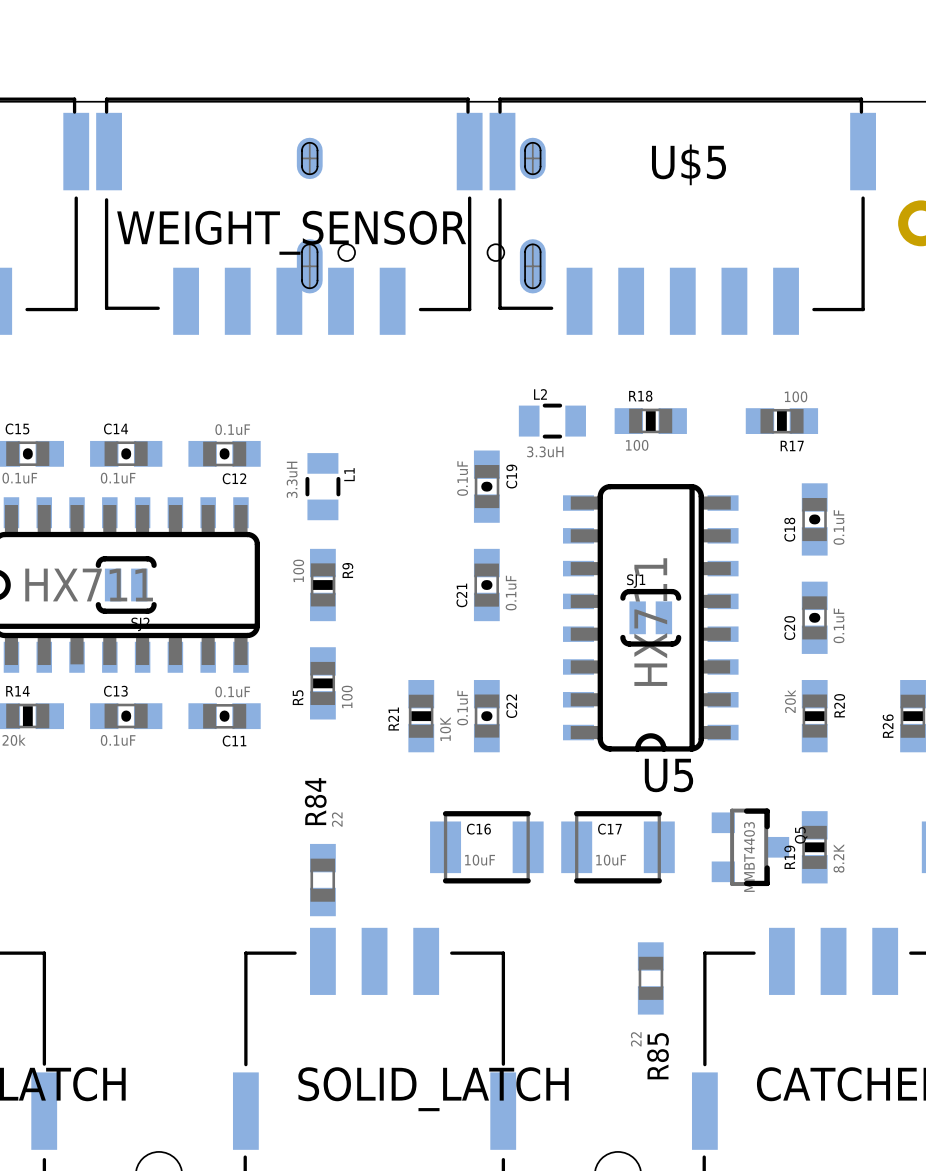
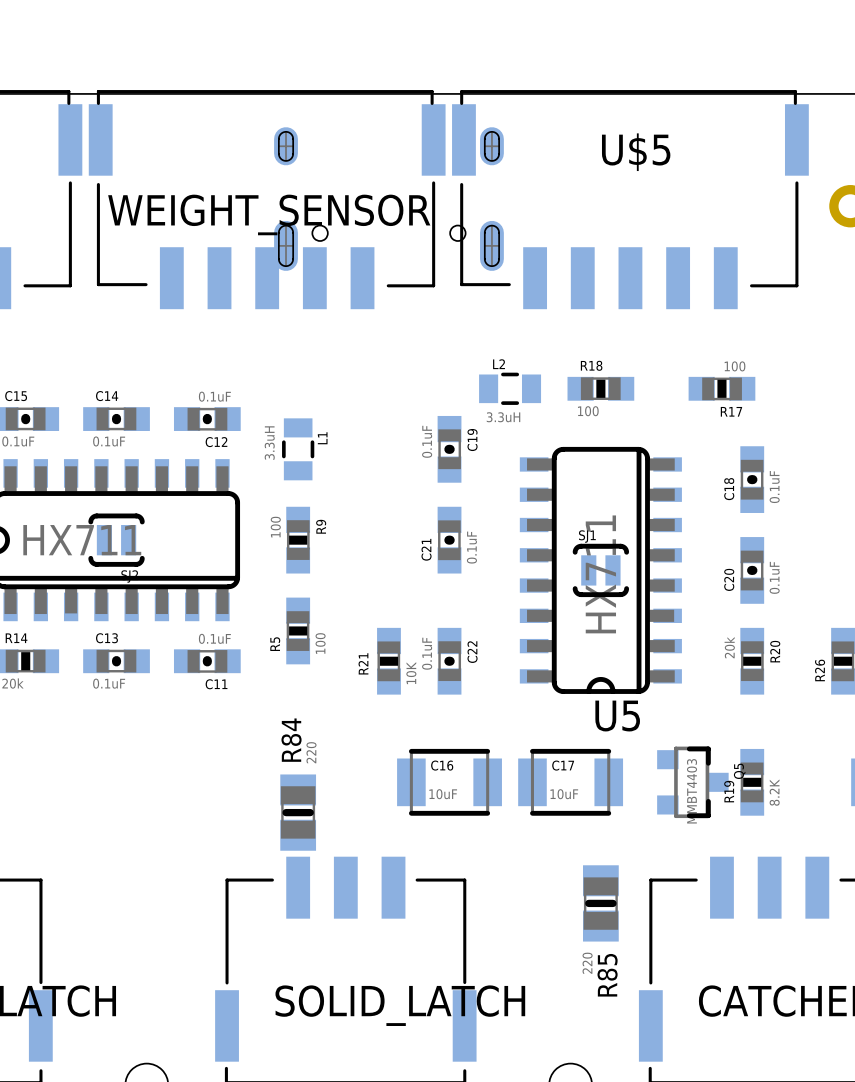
R84 value: 22 (337, 819) -> 220 (311, 752)
R84 footprint: [310, 843, 336, 917] -> [280, 774, 317, 851]
R85 footprint: [637, 942, 664, 1015] -> [583, 865, 619, 942]
R85 value: 22 (636, 1039) -> 220 (587, 963)

